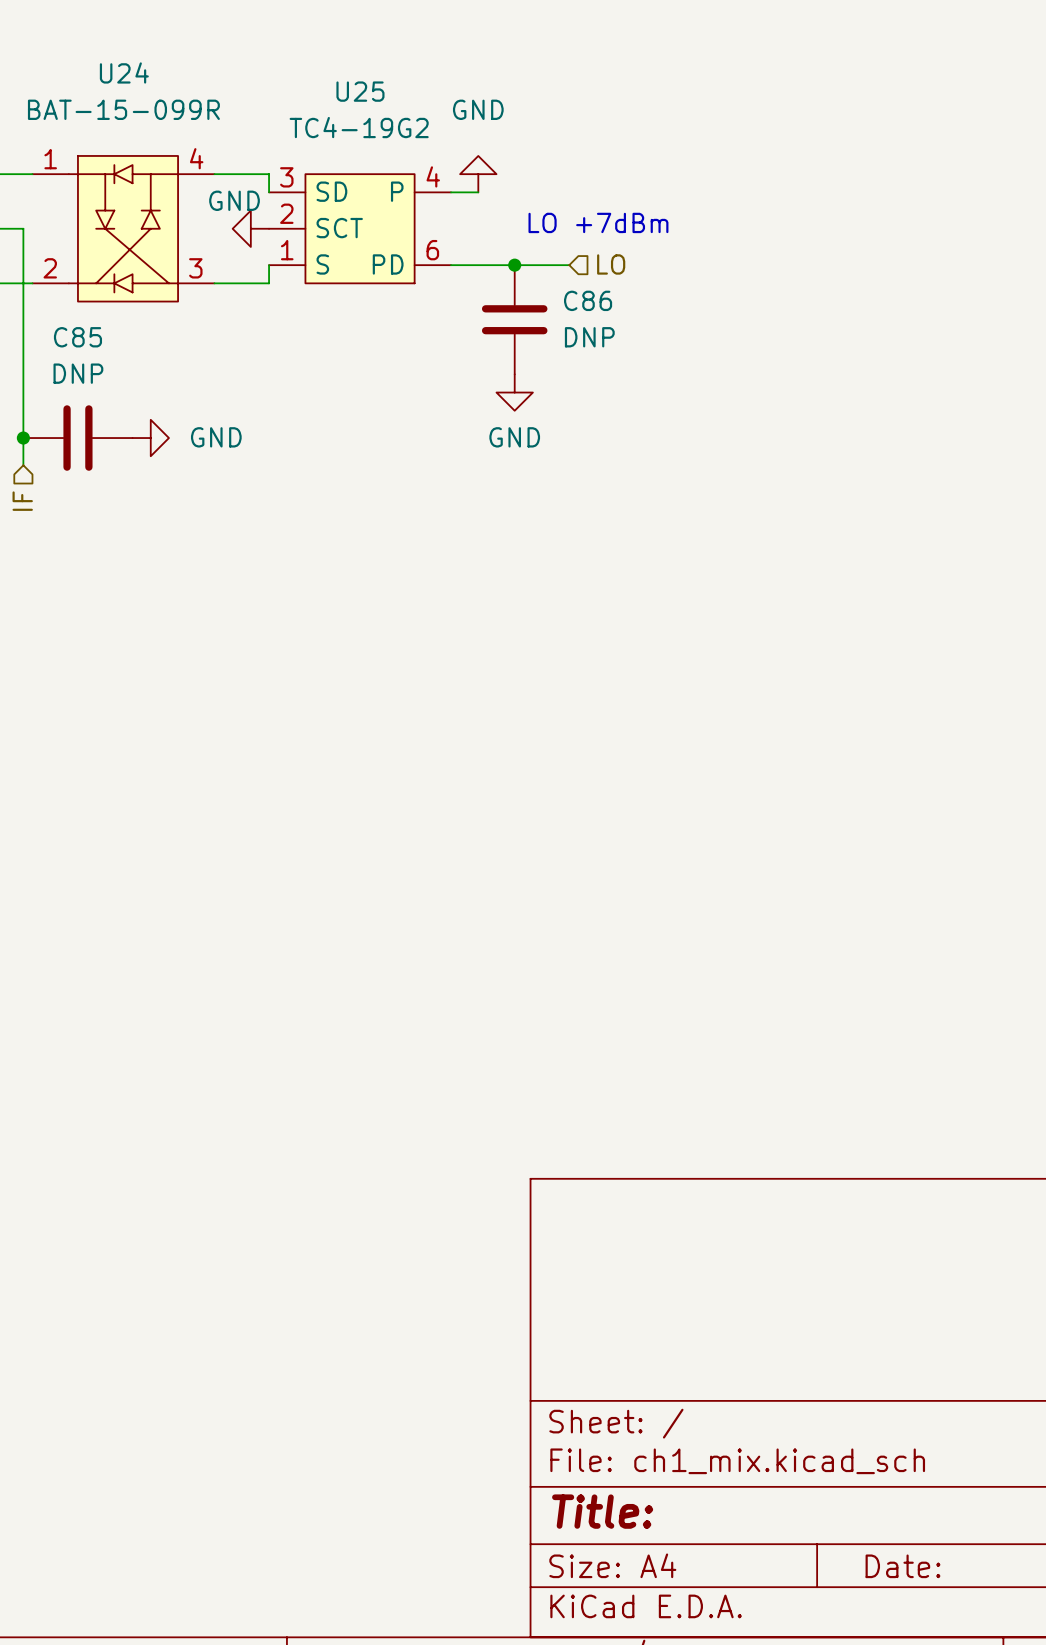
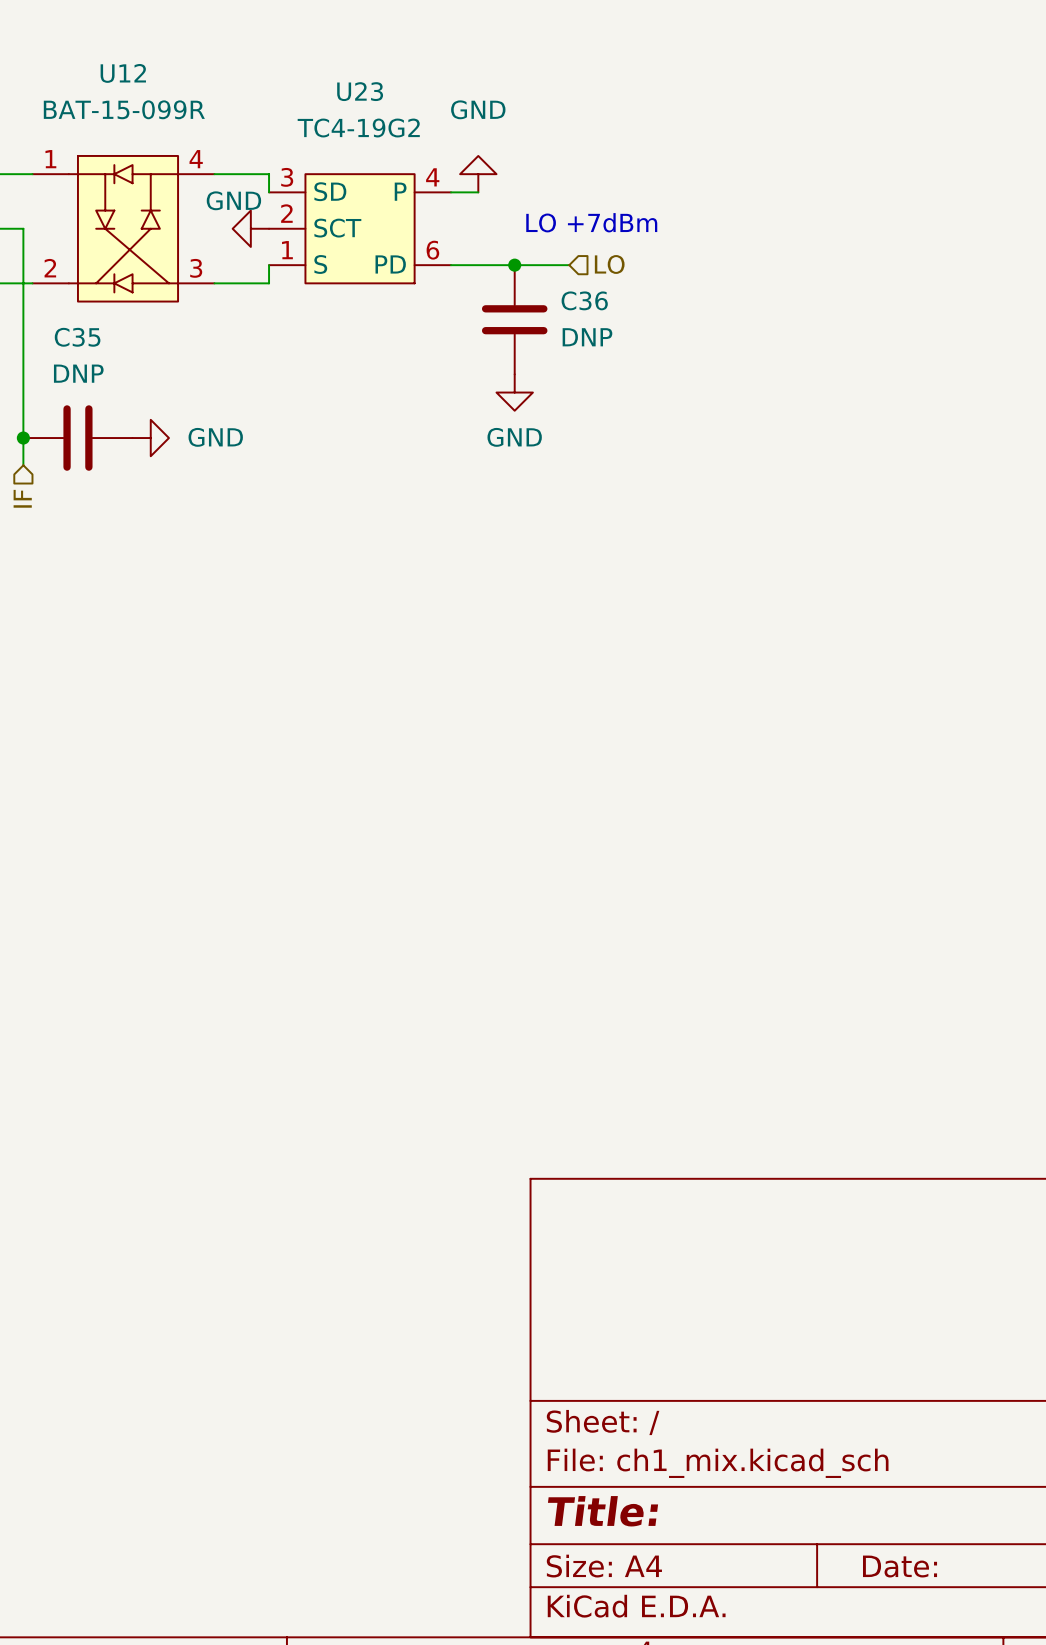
U24 name: U24 (124, 72) -> U12 (123, 73)
U25 name: U25 (360, 91) -> U23 (360, 91)
C86 name: C86 (588, 300) -> C36 (584, 300)
C85 name: C85 (77, 337) -> C35 (77, 337)

